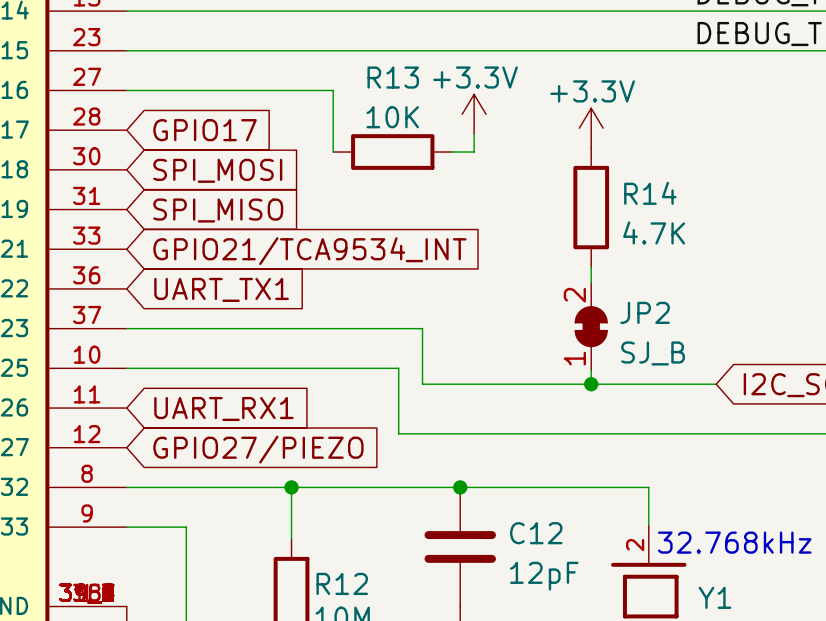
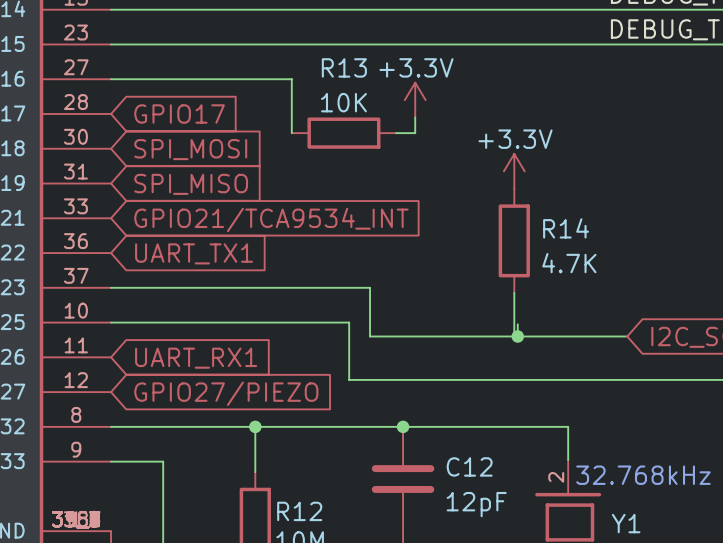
power symbol position: +3.3V (591, 128) -> +3.3V (514, 171)
R14 position: (591, 207) -> (514, 240)
wire: (591, 267) (591, 283) -> none
JP2: SJ_B (591, 326) -> none
wire: none -> (514, 293) (514, 336)

